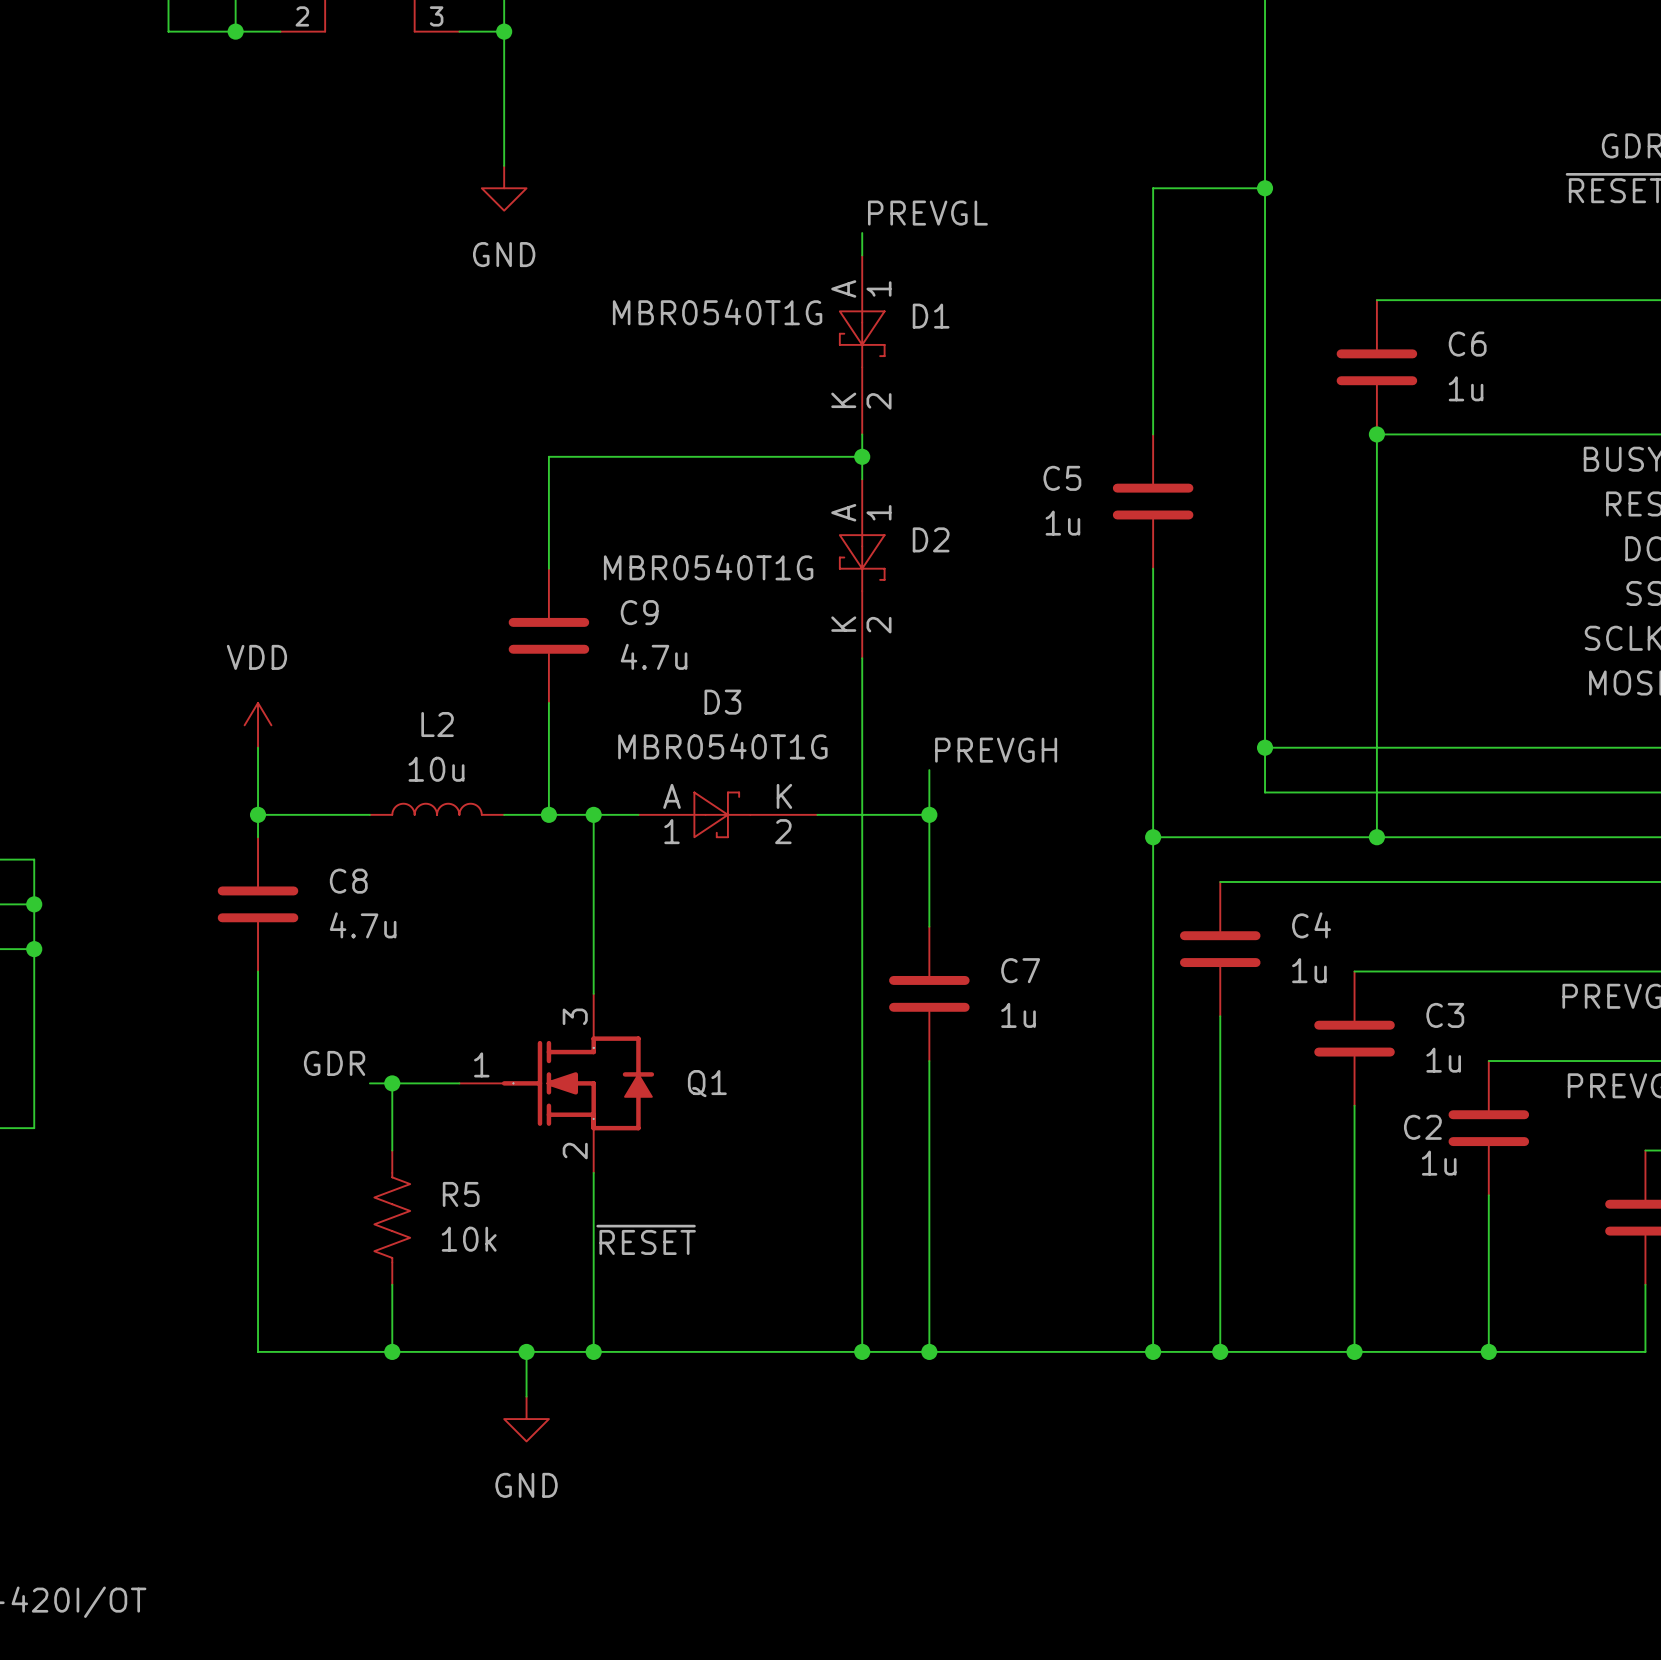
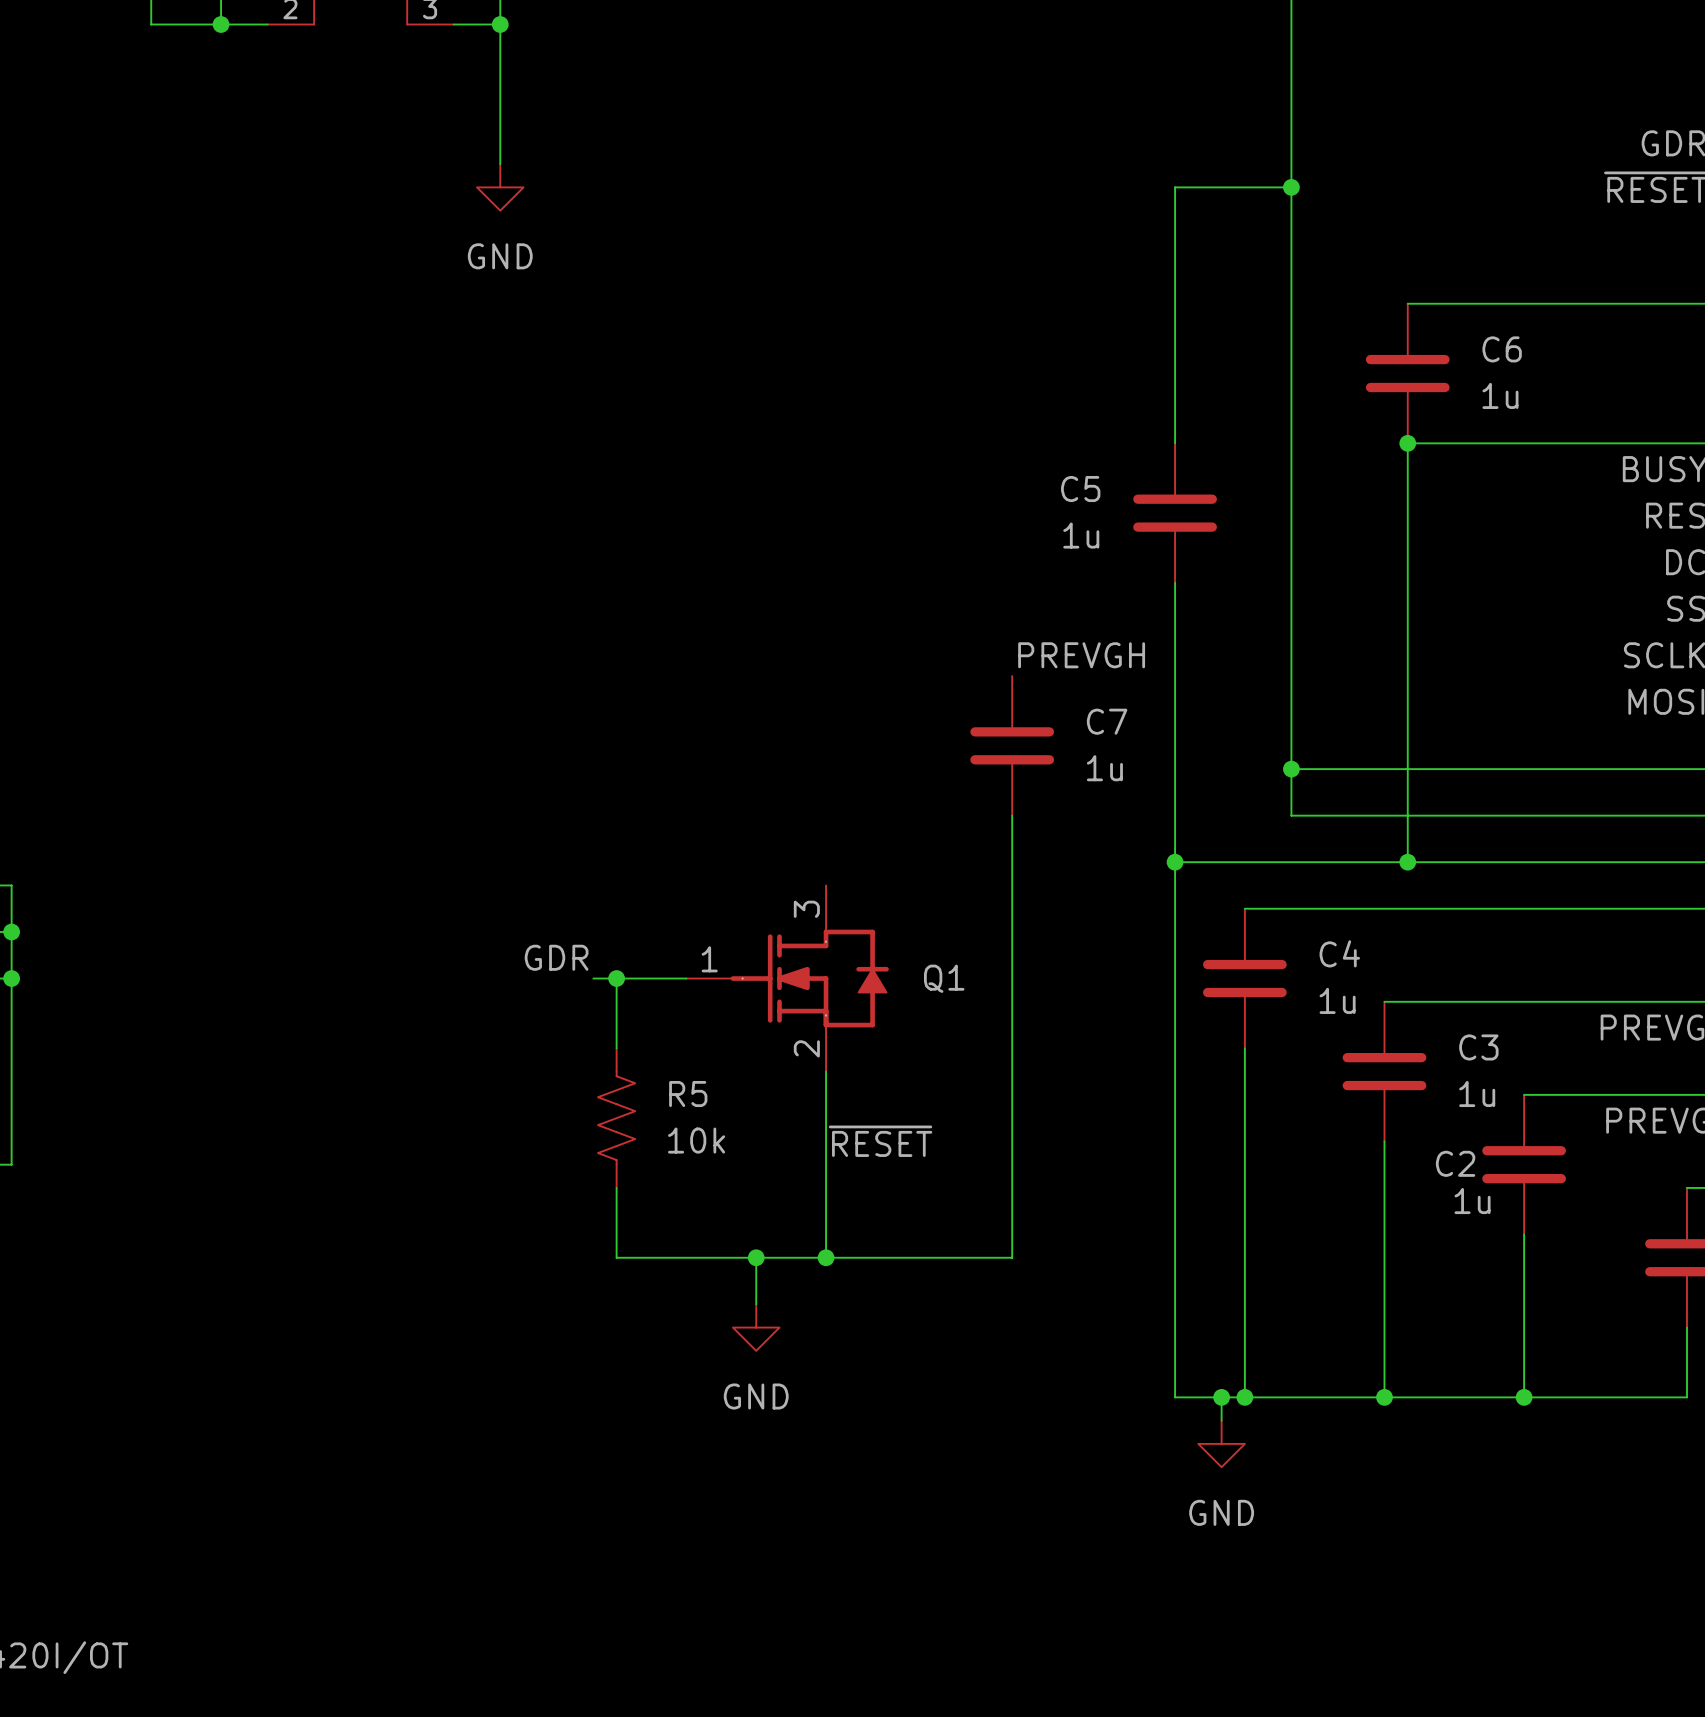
label: PREVGL (927, 213) -> none
wire: (862, 233) (862, 255) -> none
D1: MBR0540T1G (862, 344) -> none
wire: (862, 434) (862, 479) -> none
wire: (862, 456) (548, 456) (548, 568) -> none
junction: (862, 456) -> none
D2: MBR0540T1G (862, 568) -> none
C9: 4.7u (548, 635) -> none
wire: (862, 658) (862, 1351) -> none
wire: (548, 702) (548, 814) -> none
power symbol: VDD (258, 725) -> none
wire: (258, 747) (258, 837) -> none
label position: PREVGH (996, 750) -> PREVGH (1081, 655)
wire: (929, 770) (929, 926) -> none
wire: none -> (1012, 815) (1012, 1257) (616, 1257) (616, 1187)
L2: 10u (437, 809) -> none
wire: (258, 814) (369, 814) -> none
junction: (258, 814) -> none
wire: (504, 814) (638, 814) -> none
junction: (548, 814) -> none
wire: (593, 814) (593, 993) -> none
junction: (593, 814) -> none
D3: MBR0540T1G (727, 814) -> none
wire: (817, 814) (929, 814) -> none
junction: (929, 814) -> none
C8: 4.7u (258, 904) -> none
junction: none -> (616, 978)
wire: (258, 971) (258, 1351) (1153, 1351) -> none
C7 position: (929, 993) -> (1012, 745)
wire: (929, 1061) (929, 1351) -> none
label position: GDR (334, 1063) -> GDR (556, 957)
wire: (369, 1083) (459, 1083) -> (593, 978) (686, 978)
wire: (392, 1083) (392, 1150) -> (616, 978) (616, 1048)
junction: (392, 1083) -> none
Q1 position: (556, 1083) -> (787, 978)
wire: (593, 1172) (593, 1351) -> (826, 1071) (826, 1257)
R5 position: (392, 1217) -> (616, 1118)
junction: none -> (756, 1257)
junction: none -> (826, 1257)
label position: ~{RESET} (646, 1239) -> ~{RESET} (880, 1141)
wire: (392, 1284) (392, 1351) -> none
junction: (392, 1351) -> none
wire: (526, 1351) (526, 1396) -> (756, 1257) (756, 1304)
junction: (526, 1351) -> none
junction: (593, 1351) -> none
junction: (862, 1351) -> none
junction: (929, 1351) -> none
junction position: (1153, 1351) -> (1221, 1397)
wire: none -> (1221, 1397) (1221, 1420)
power symbol: none -> GND (1221, 1443)
power symbol position: GND (526, 1419) -> GND (756, 1327)

